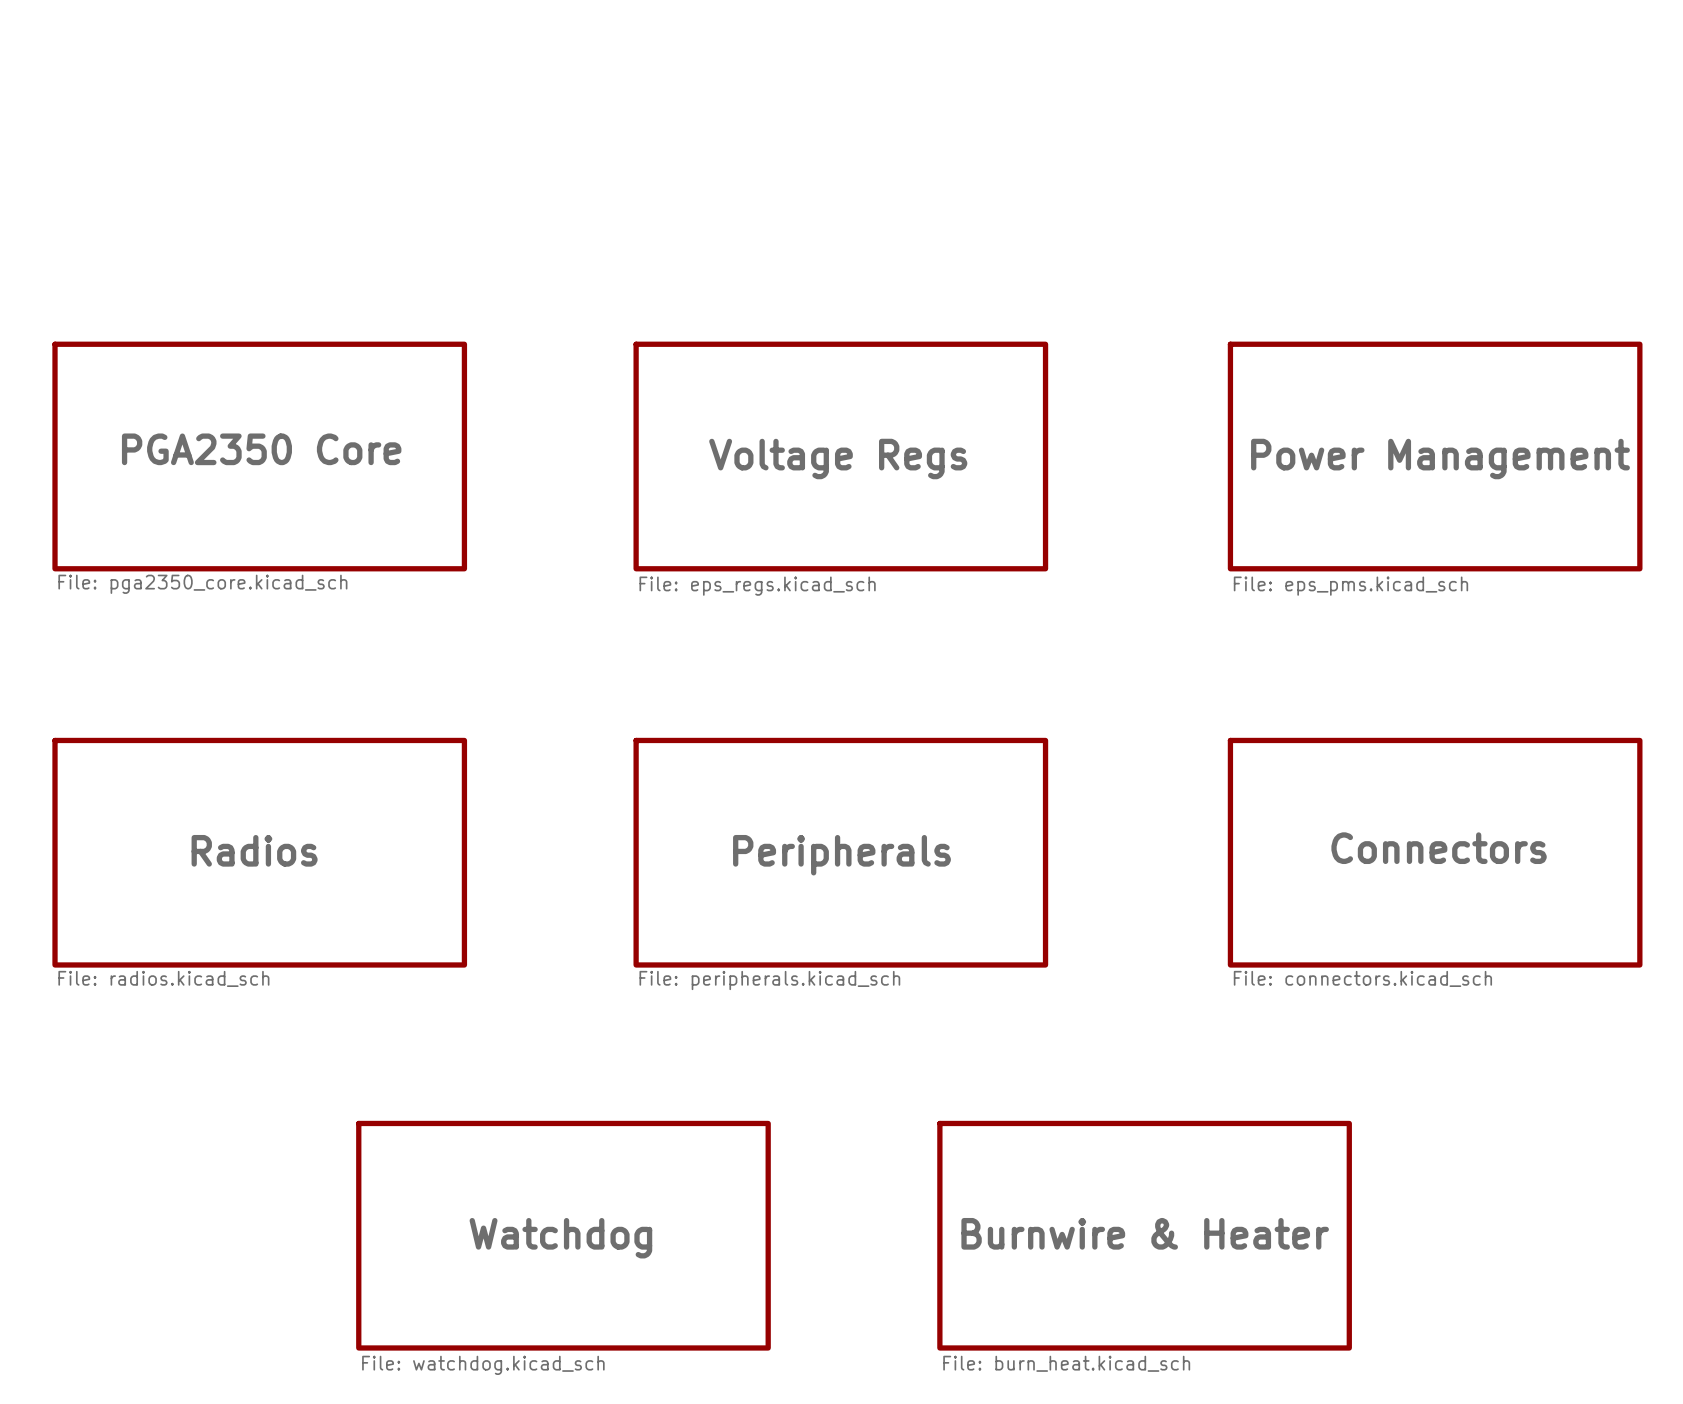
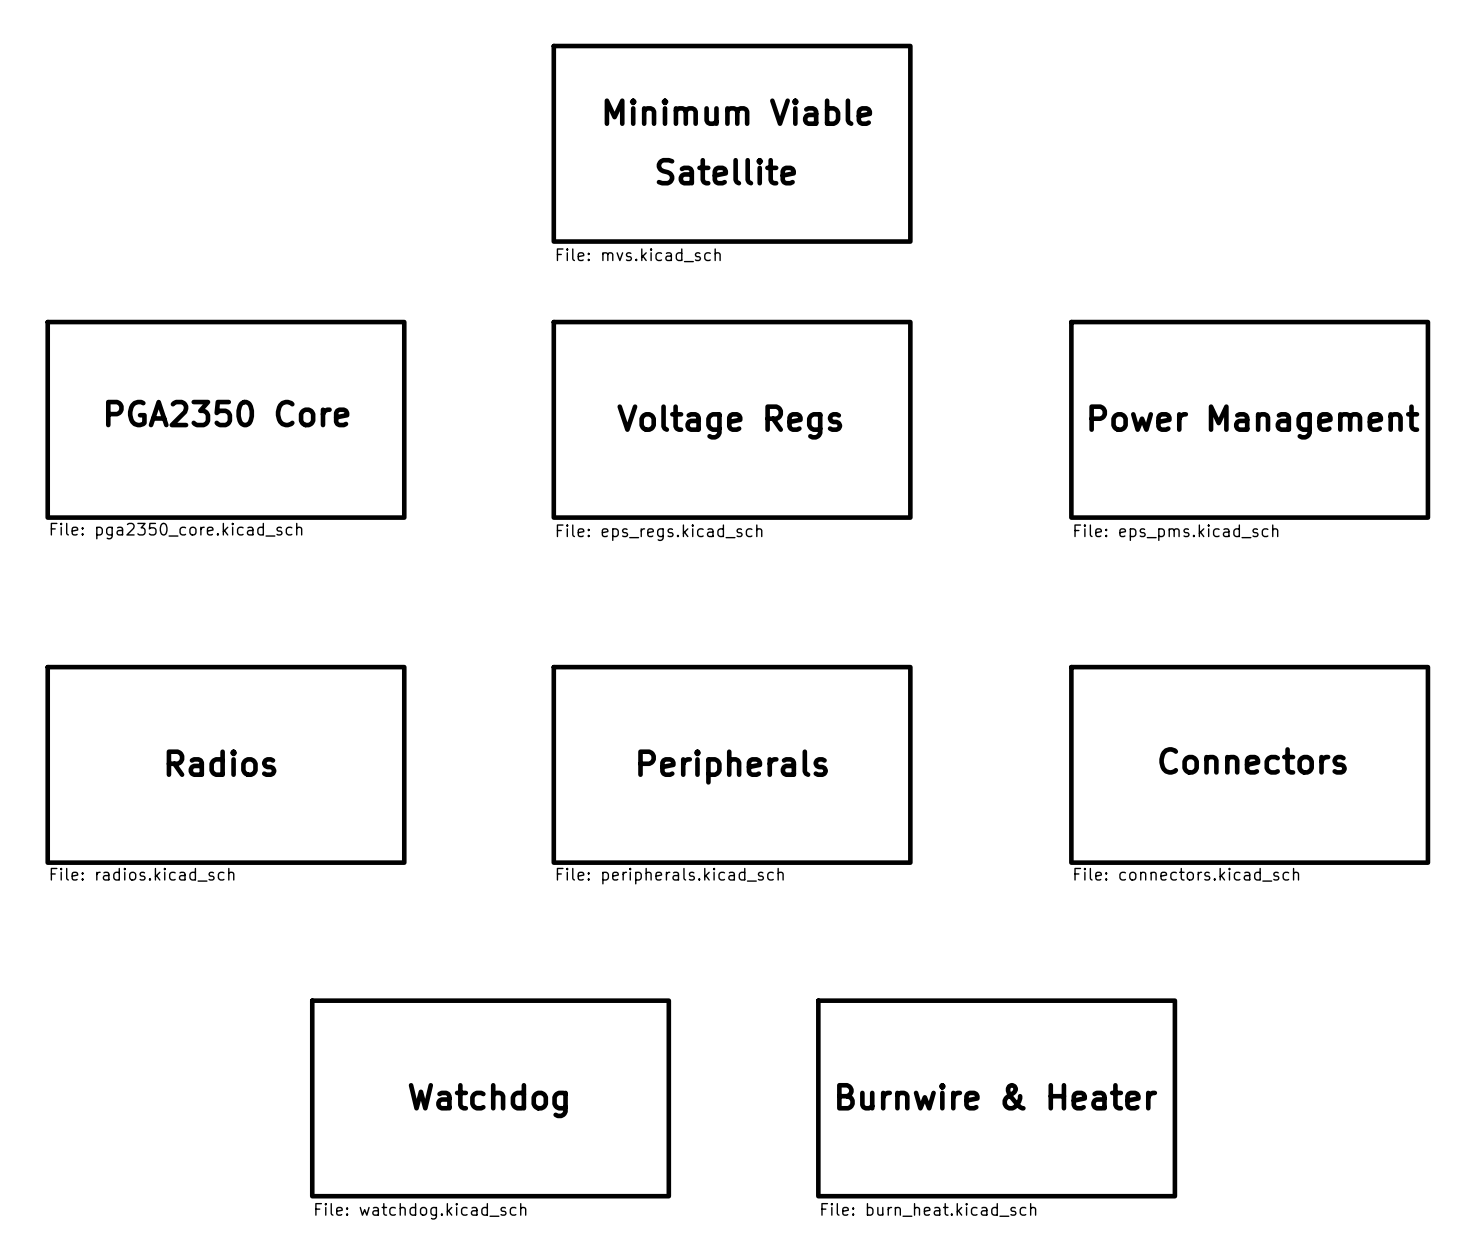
sheet Minimum Viable: none -> File: mvs.kicad_sch (732, 143)
text: none -> Satellite (726, 171)

